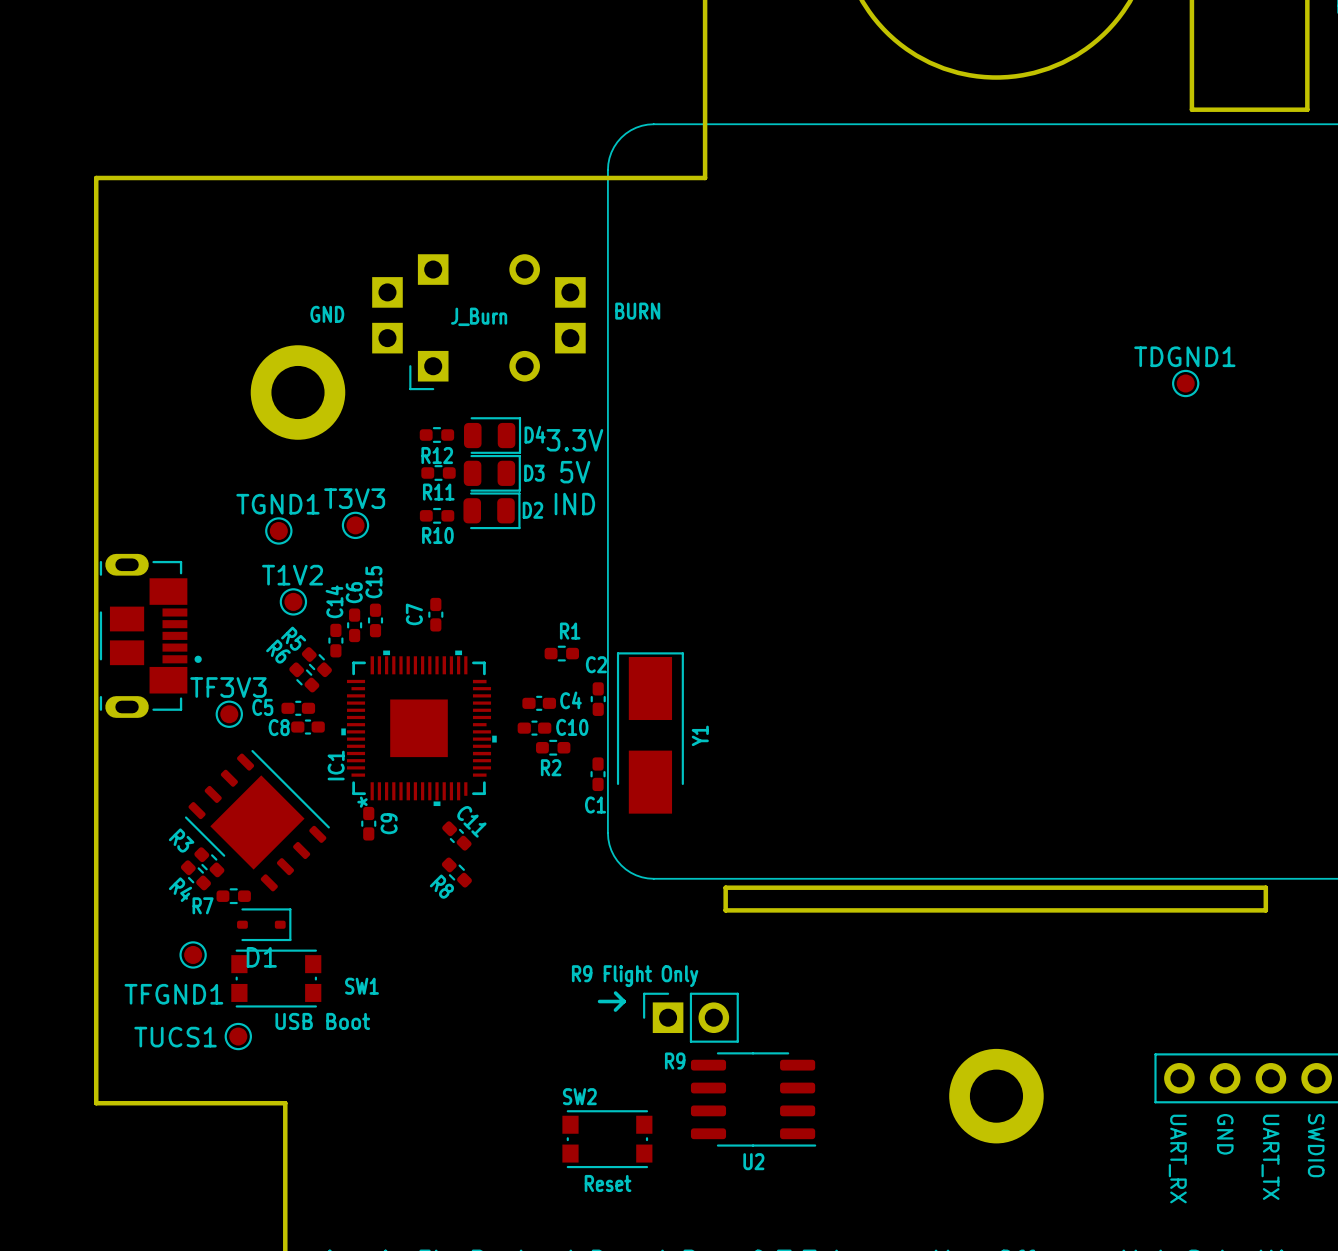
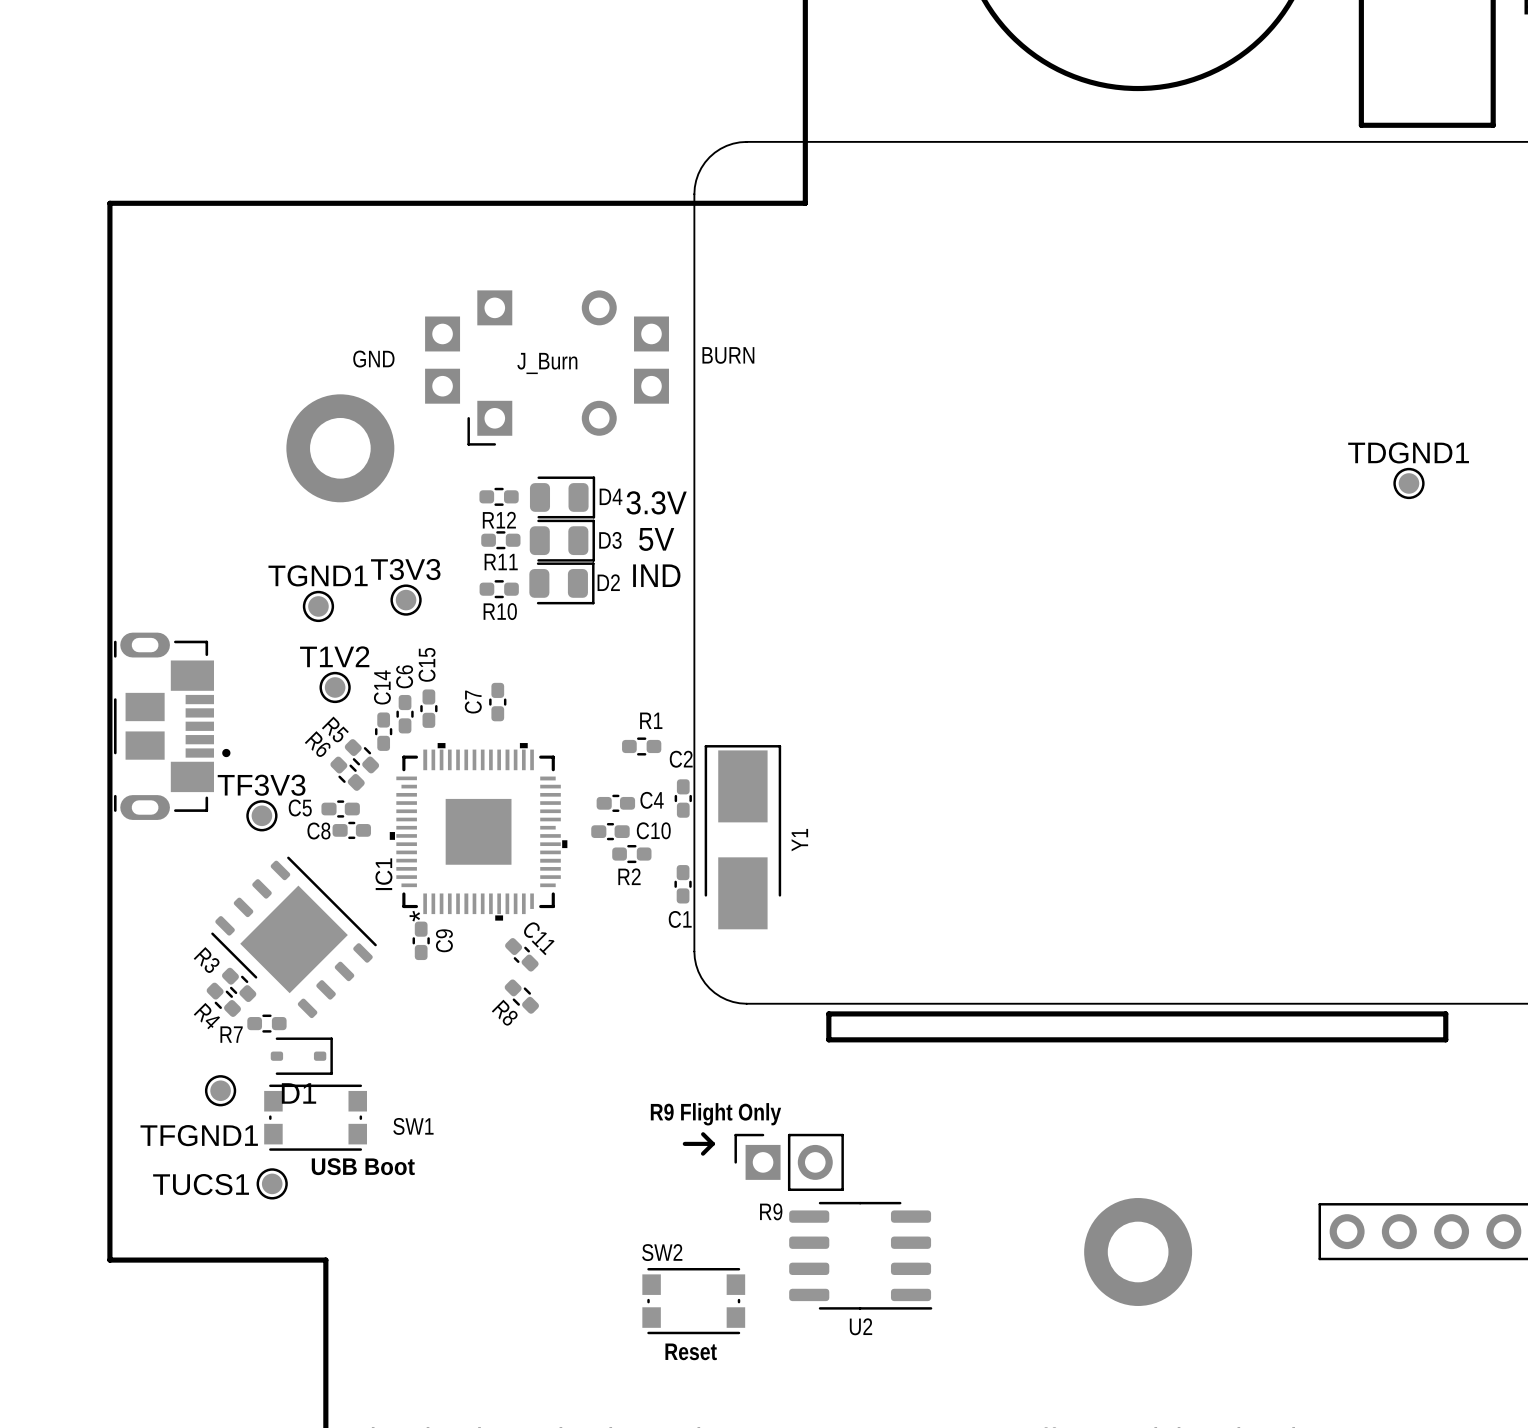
TDGND1 position: (1185, 383) -> (1408, 483)
text: GND (1225, 1134) -> none
text: SWDIO (1316, 1145) -> none
text: UART_TX (1270, 1157) -> none
text: UART_RX (1177, 1159) -> none

